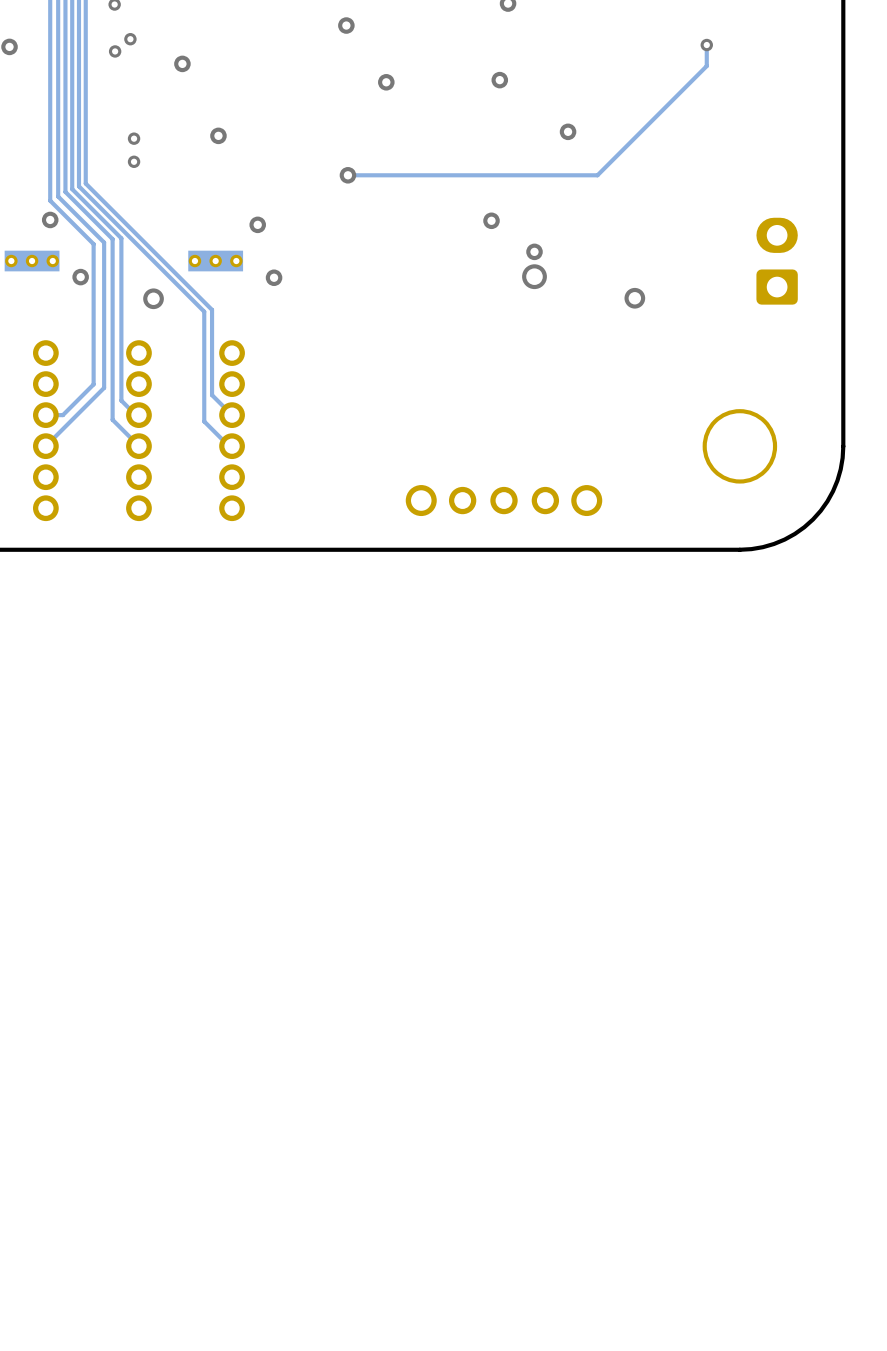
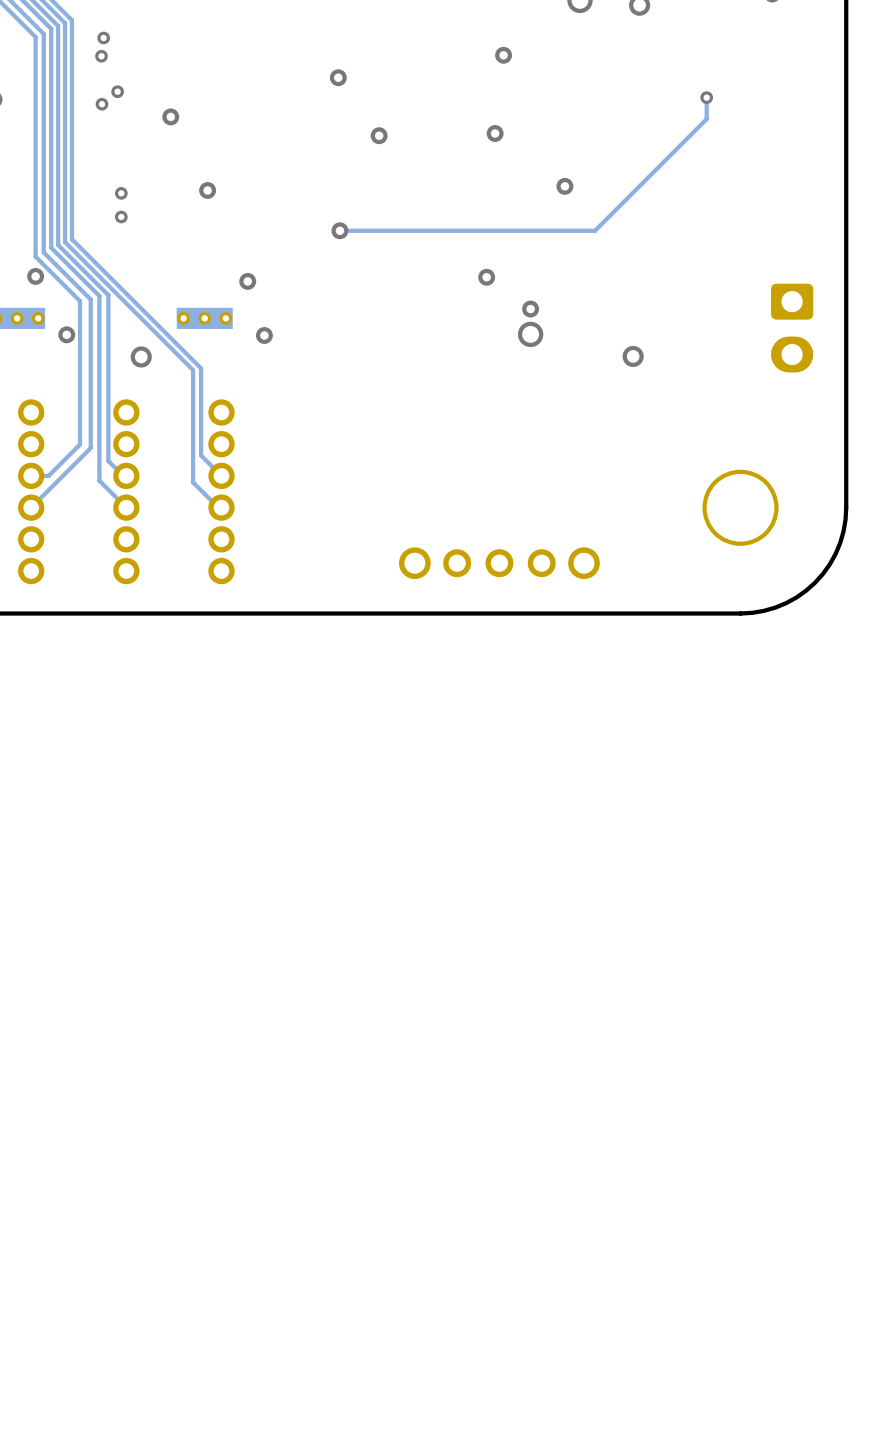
part rotation: 0° (777, 261) -> 180° (792, 328)

